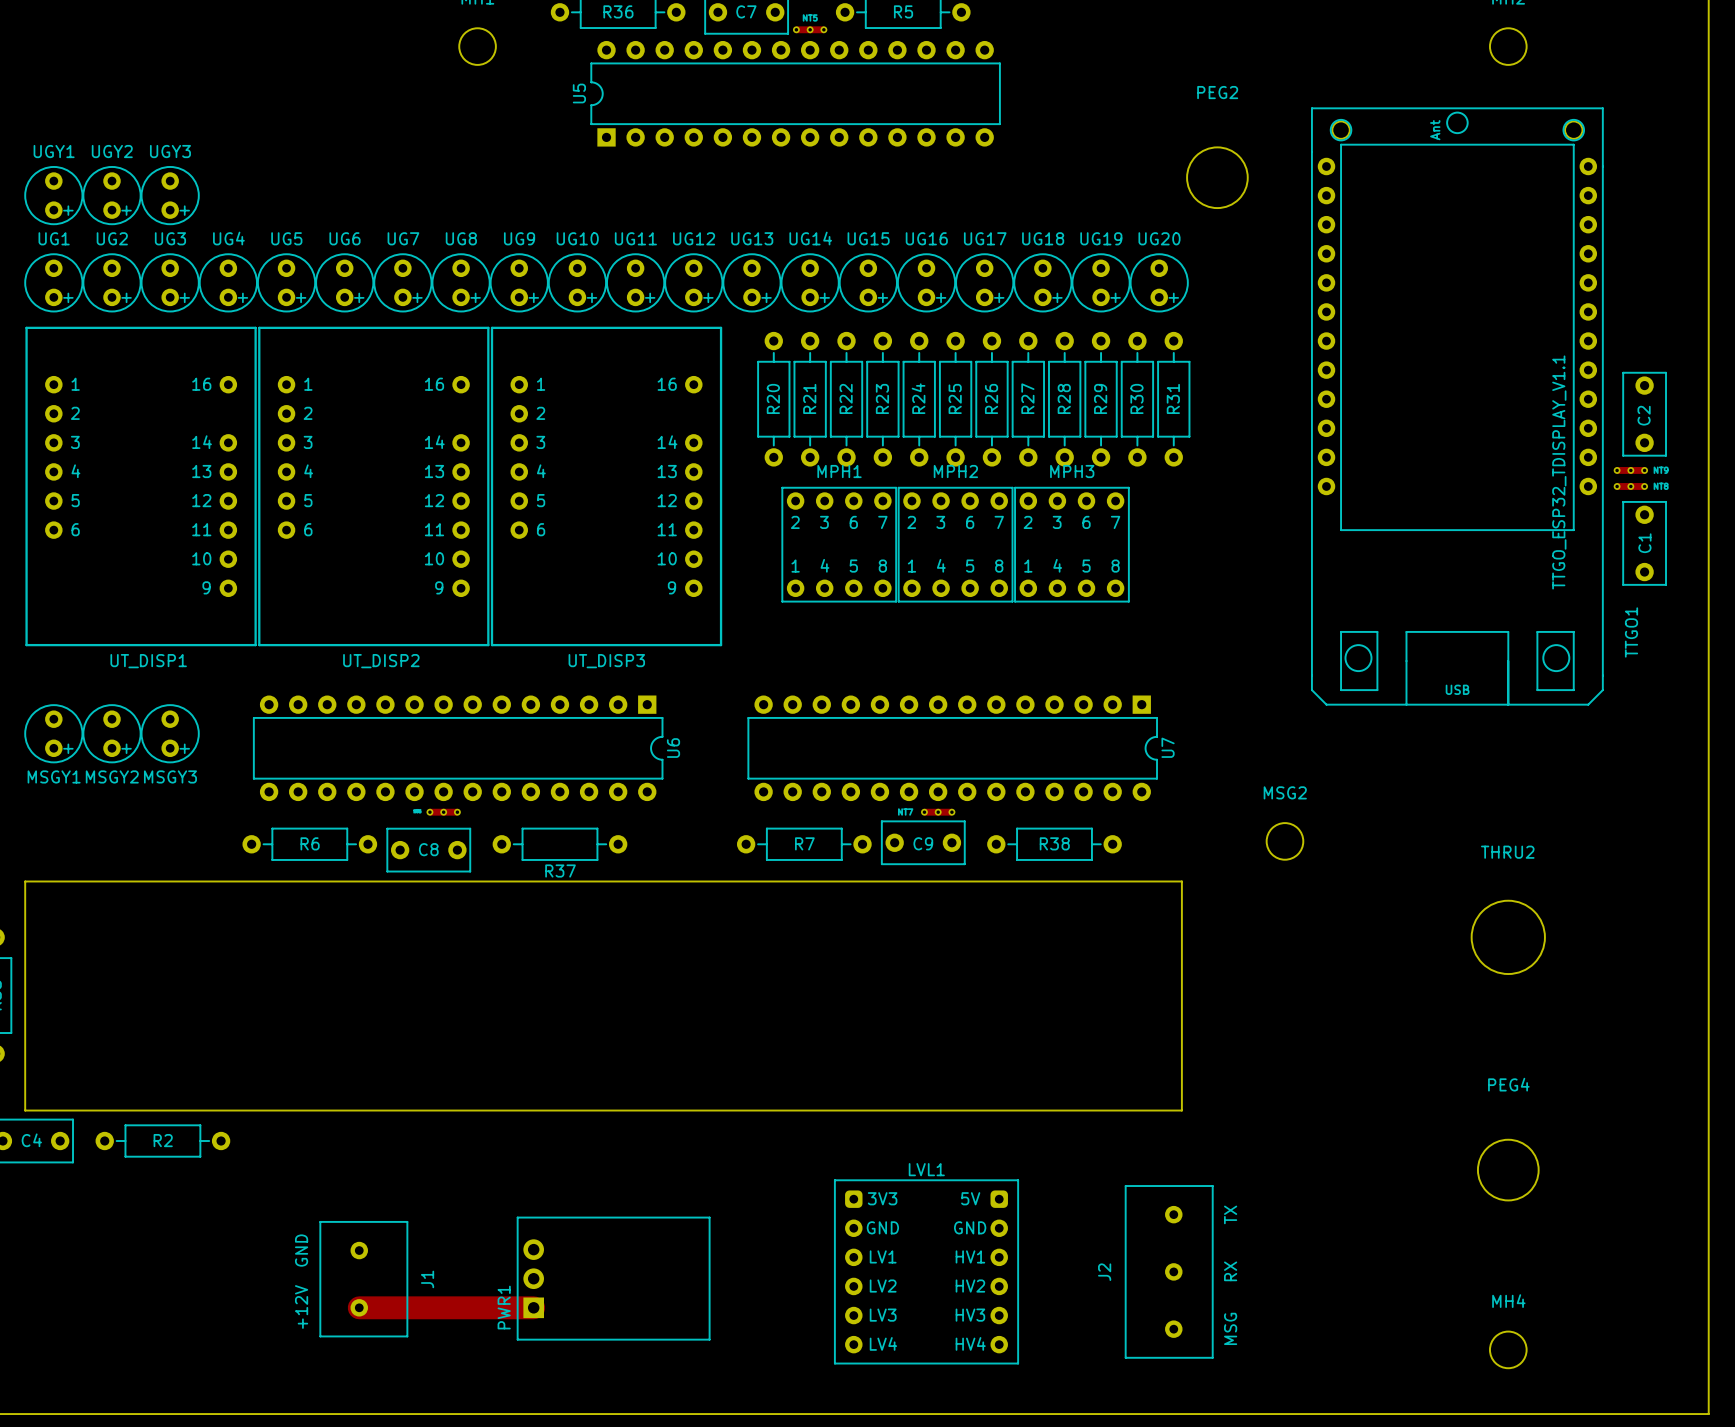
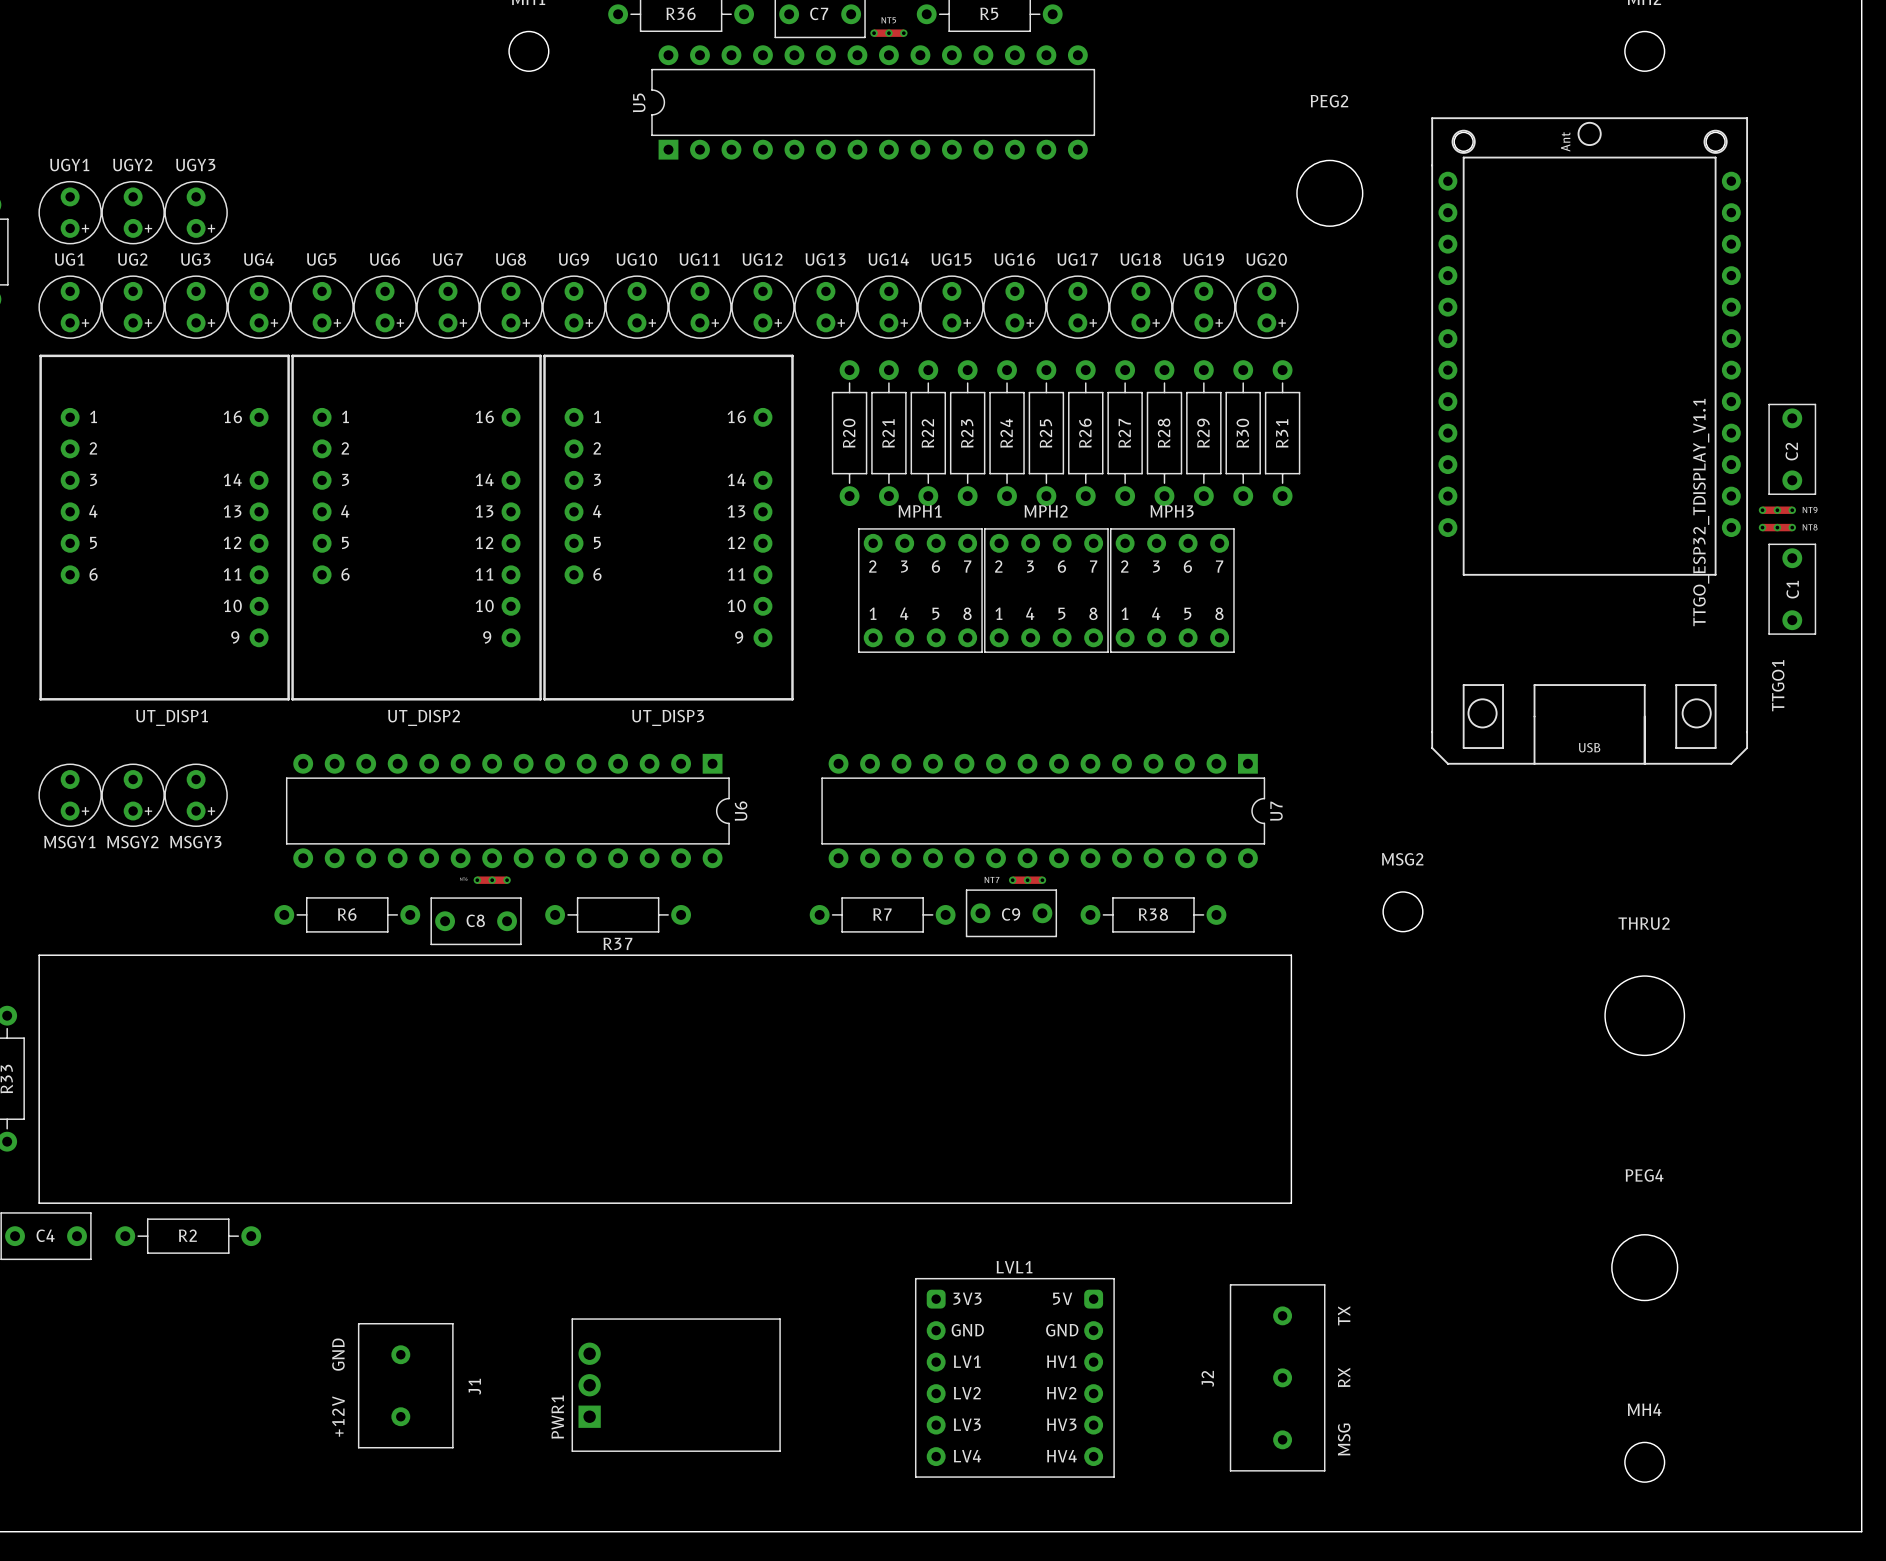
track: (359, 1307) (533, 1307) -> none

